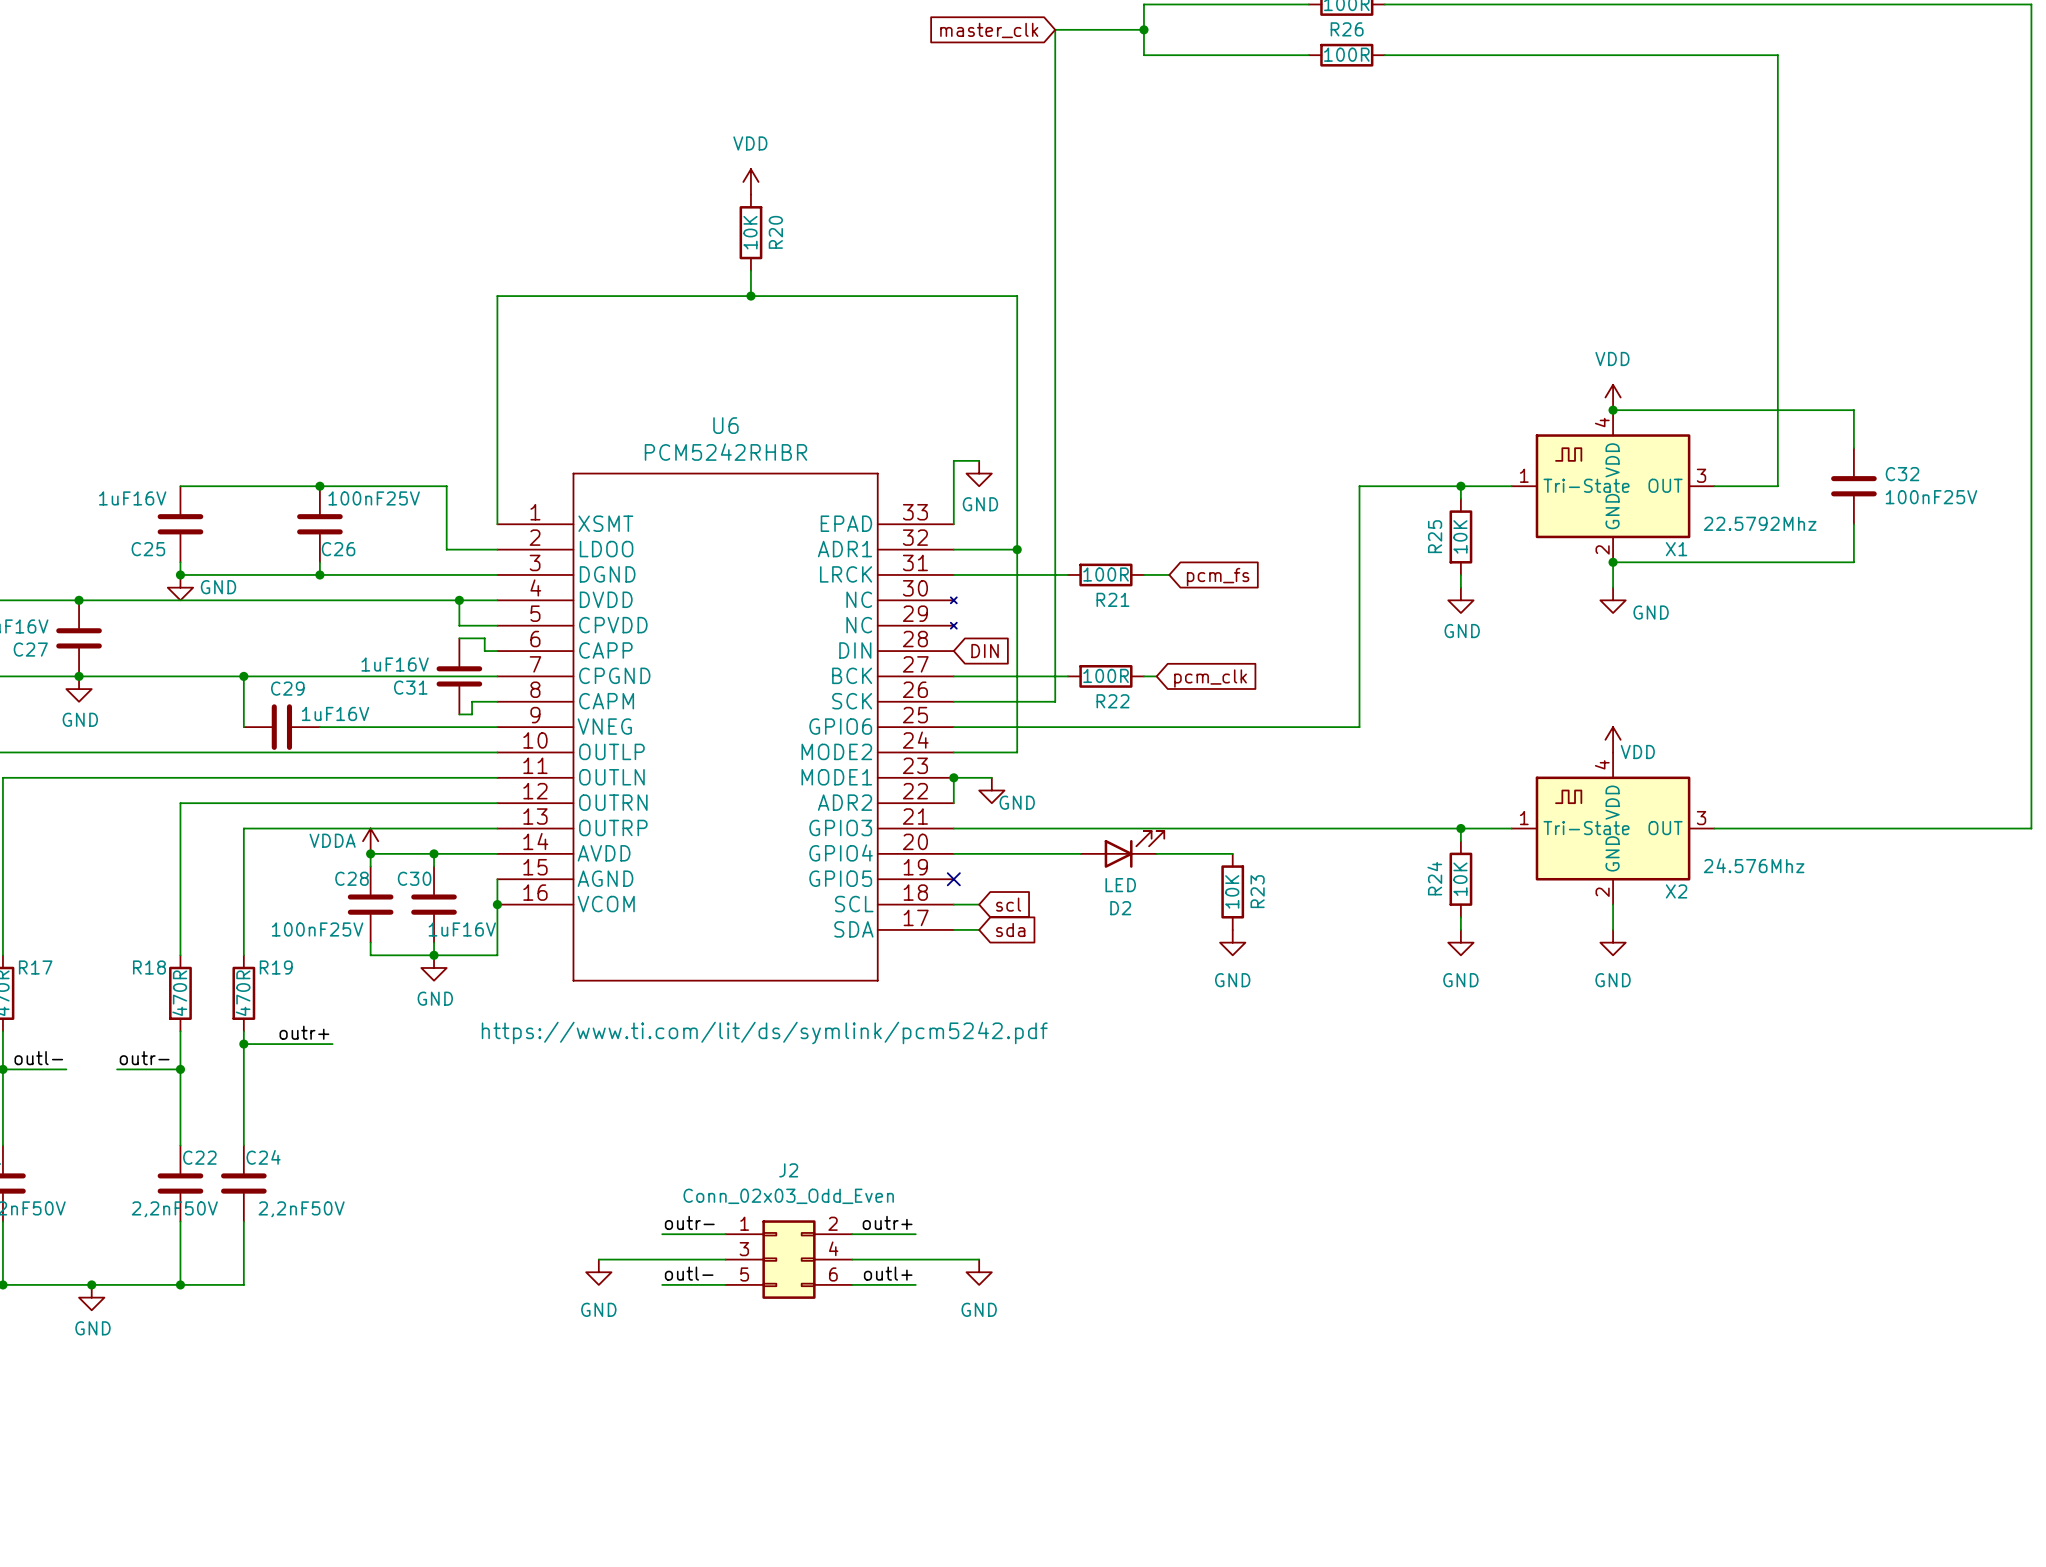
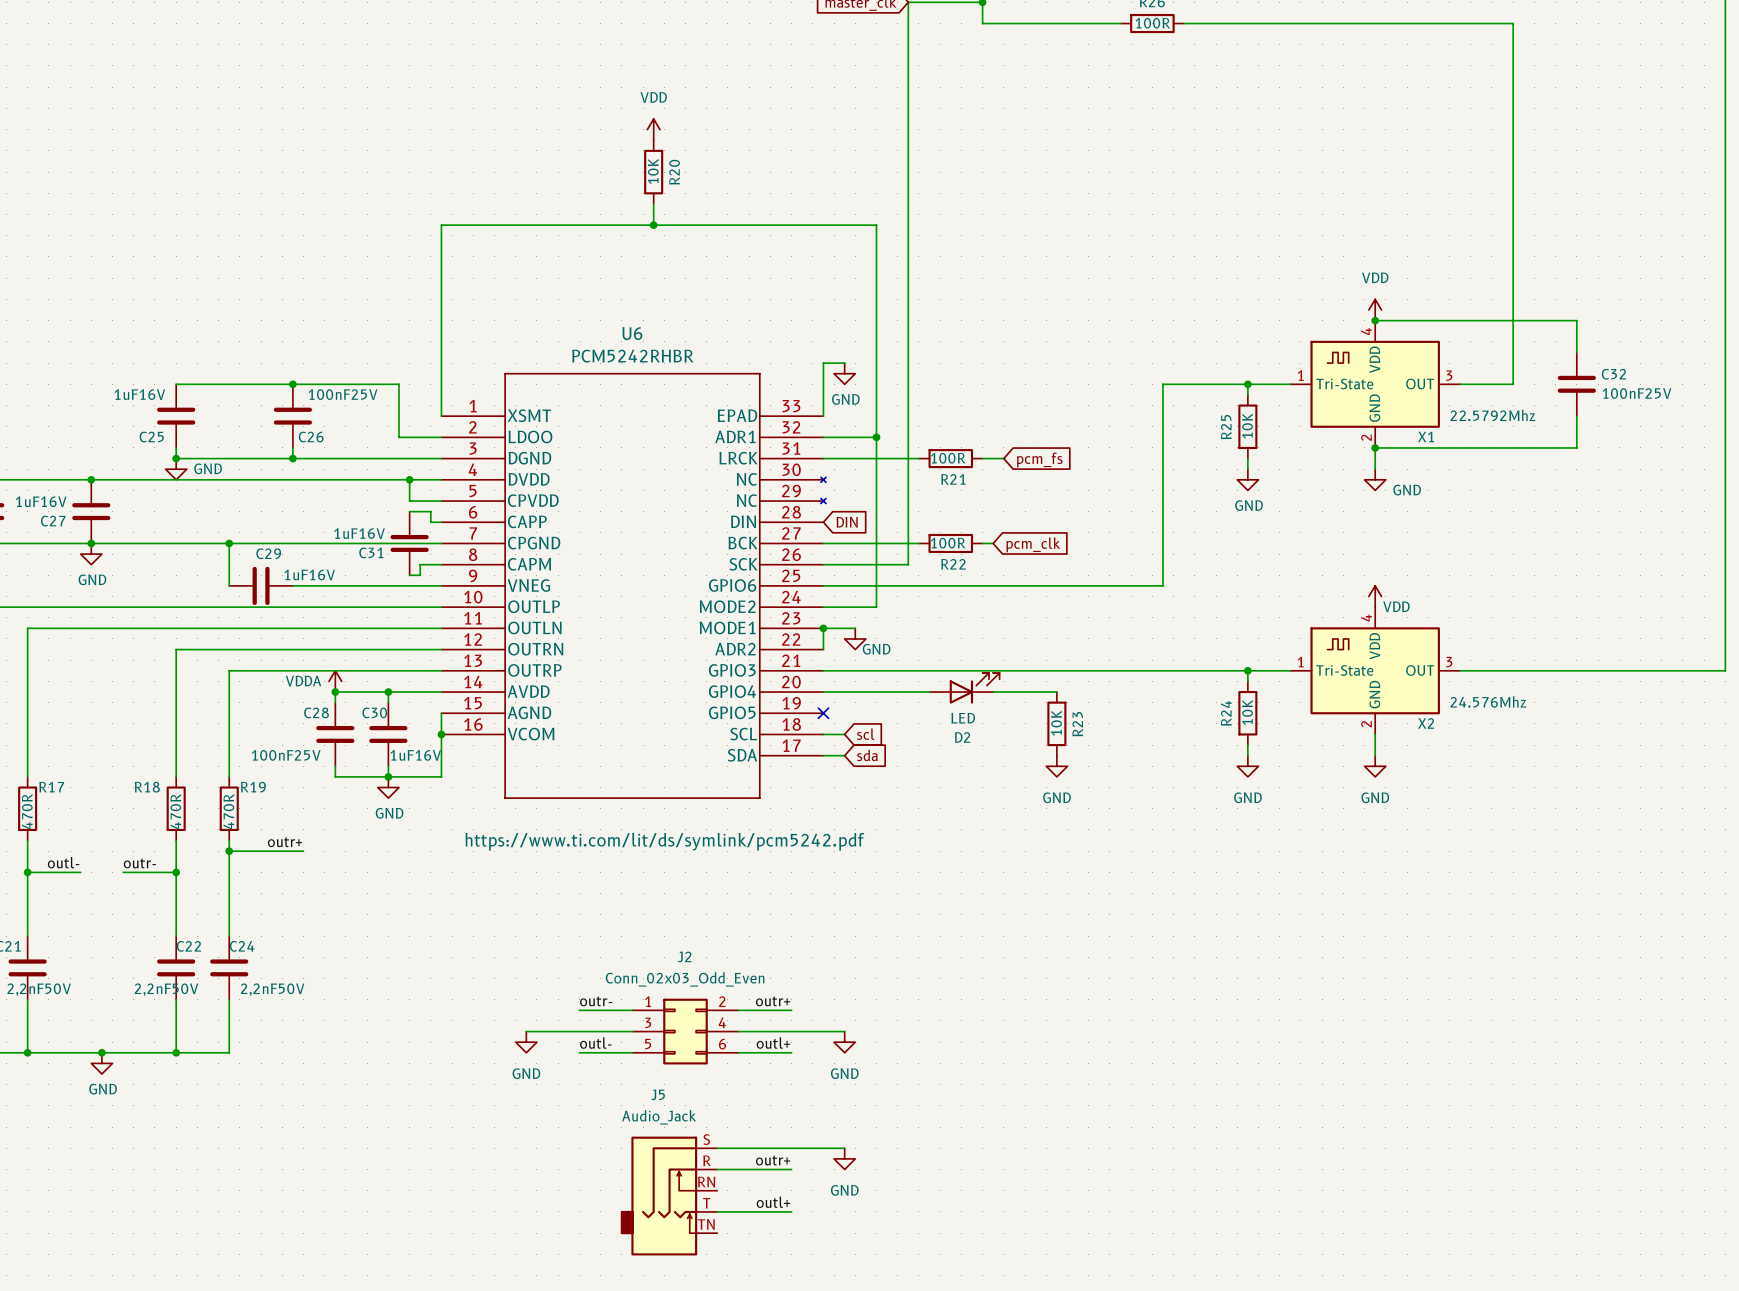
wire: none -> (717, 1148) (844, 1148)
power symbol: none -> GND (844, 1158)
label: none -> outr+ (773, 1160)
wire: none -> (717, 1169) (791, 1169)
J5: none -> Audio_Jack (669, 1196)
label: none -> outl+ (773, 1202)
wire: none -> (717, 1211) (791, 1211)

